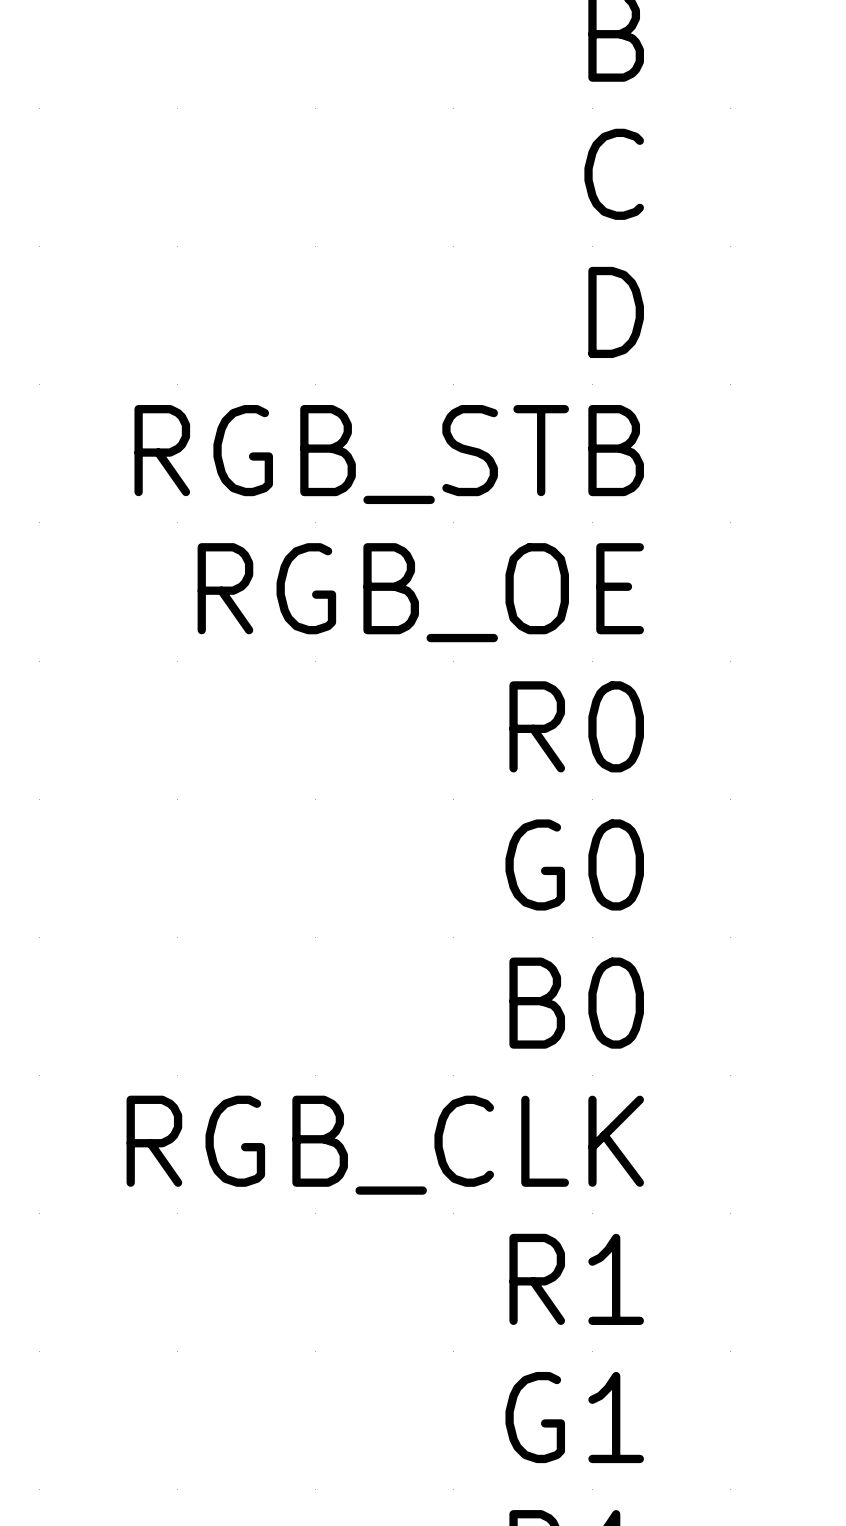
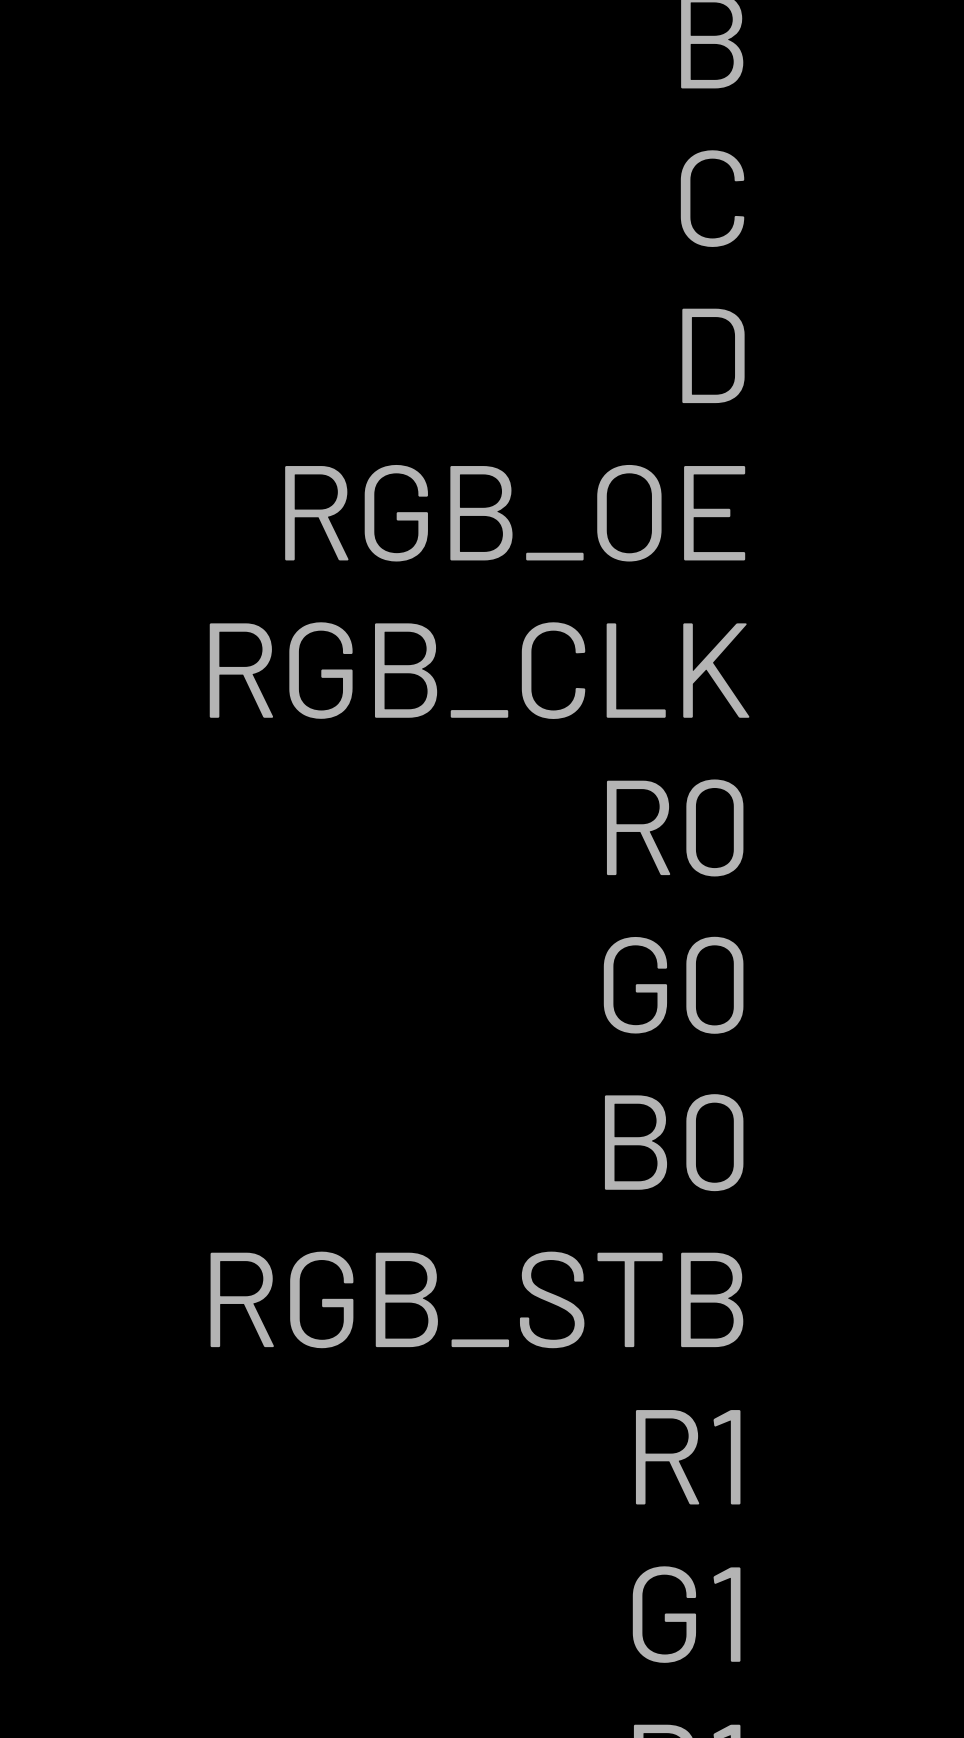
label: RGB_STB (389, 454) -> RGB_OE (515, 513)
label: RGB_OE (420, 592) -> RGB_CLK (479, 670)
label: RGB_CLK (385, 1145) -> RGB_STB (476, 1299)

